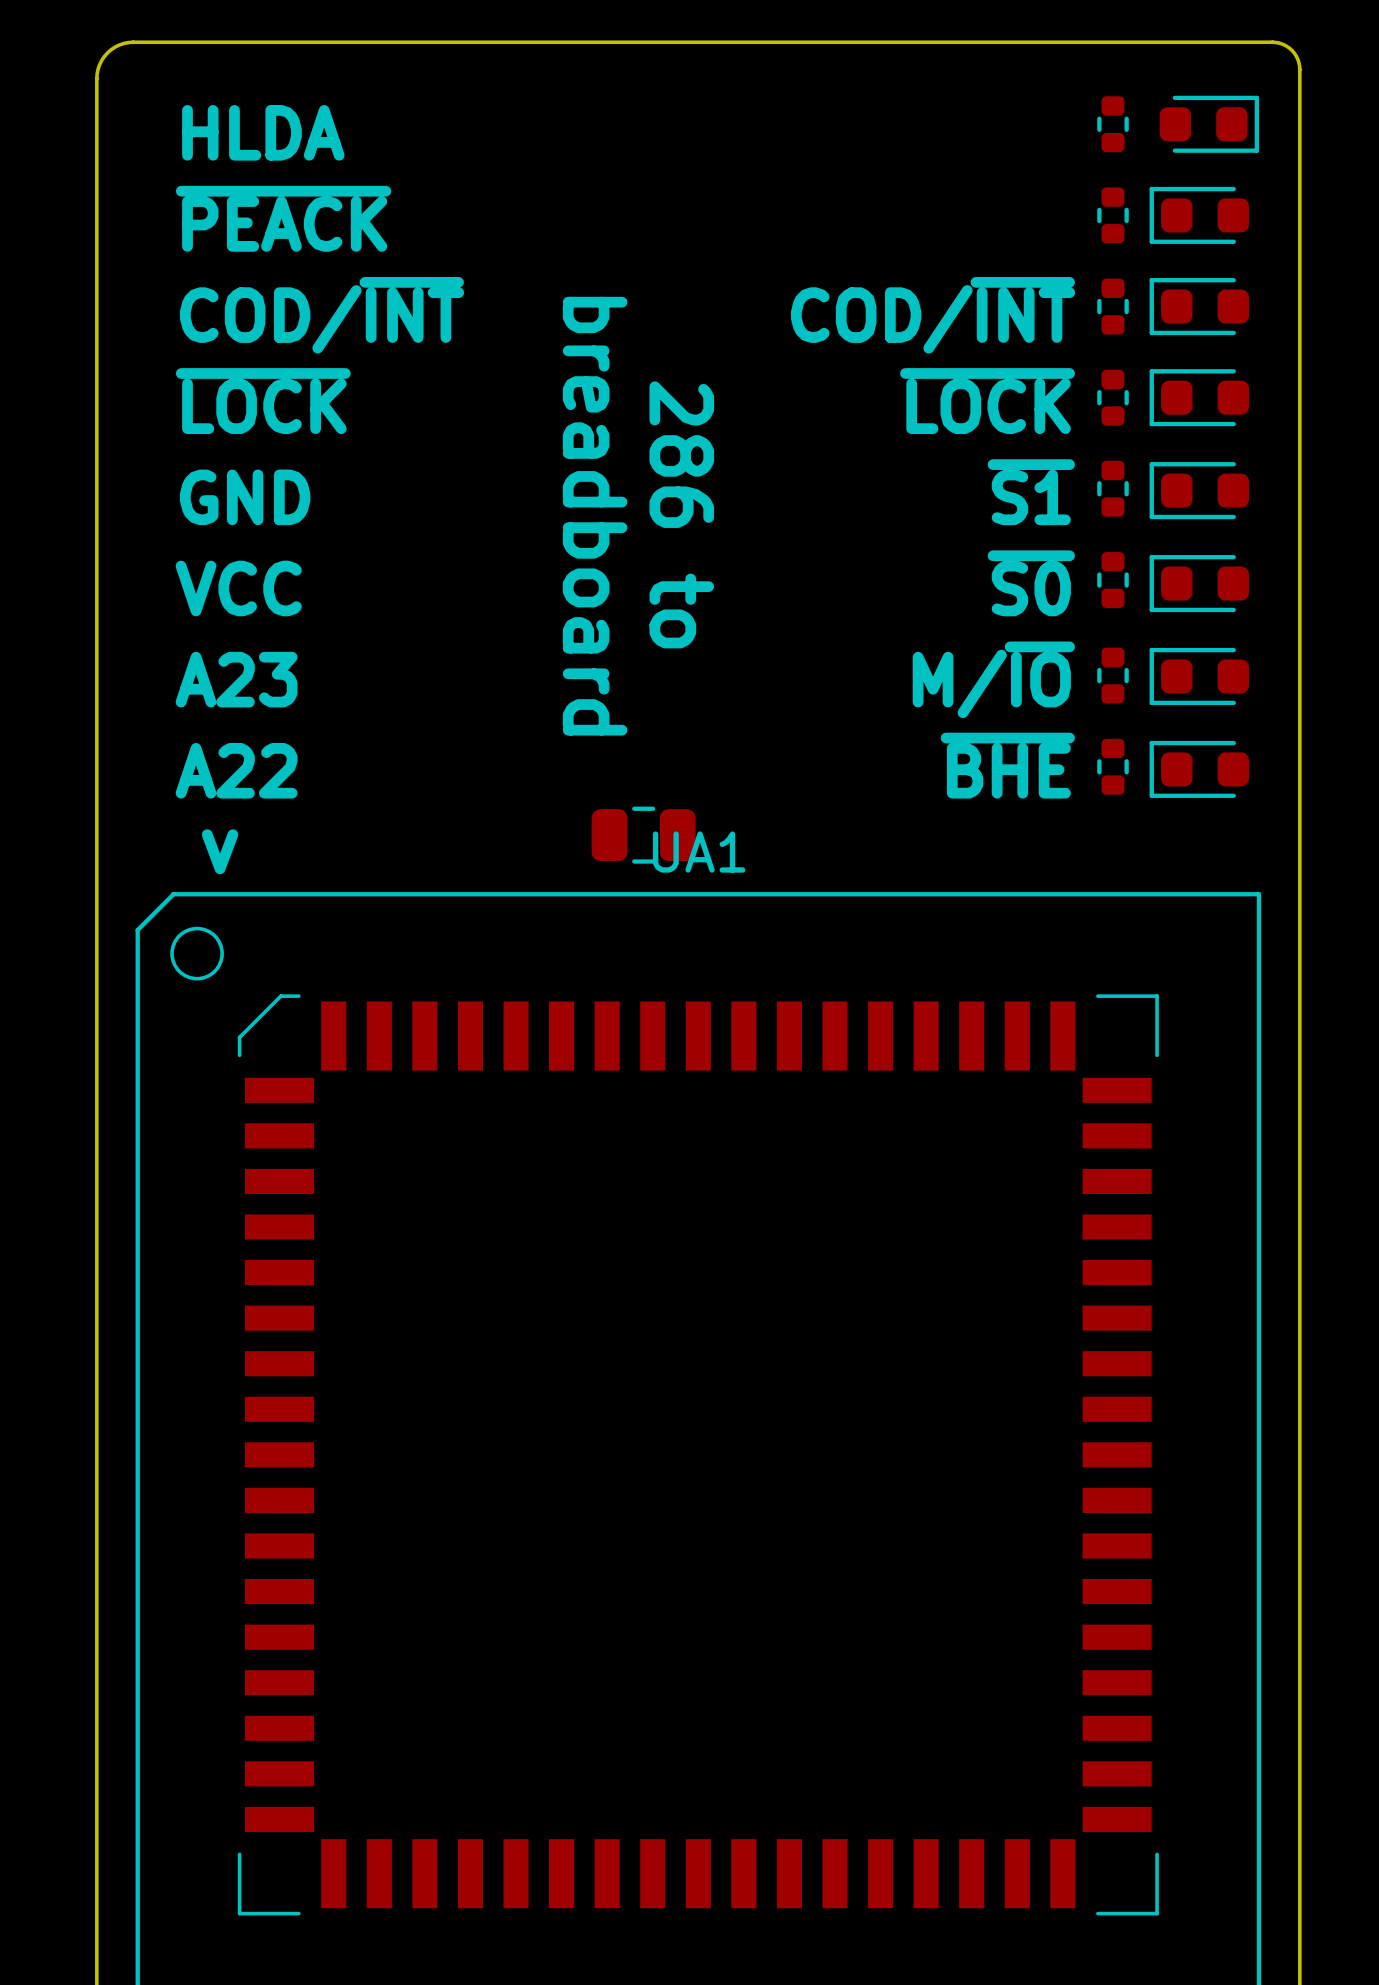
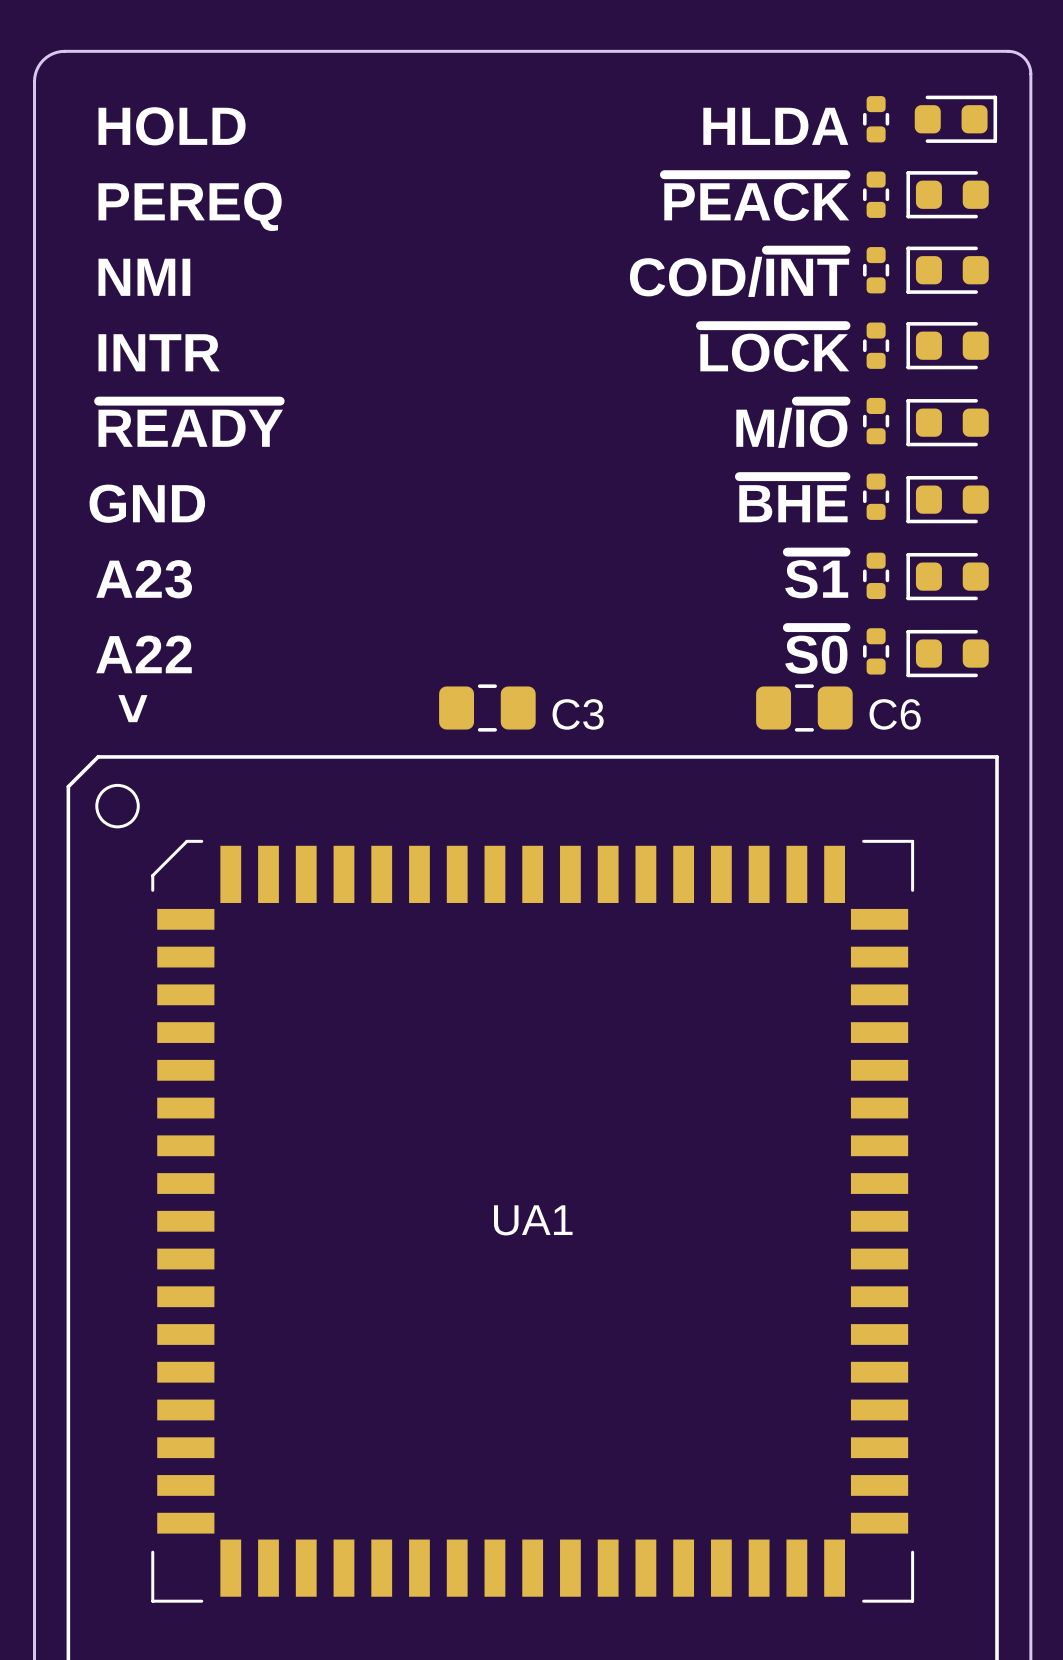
text: HLDA (263, 132) -> HOLD (172, 126)
text: none -> HLDA (775, 126)
text: ~{PEACK} (283, 218) -> PEREQ (190, 206)
text: none -> ~{PEACK} (756, 197)
text: COD/~{INT} (322, 315) -> NMI (144, 277)
text: ~{LOCK} (263, 401) -> INTR (159, 352)
text: ~{S1} (1031, 492) -> M/~{IO} (791, 424)
text: GND (245, 497) -> ~{READY} (190, 423)
text: 286 to (681, 514) -> none
text: breadboard (595, 516) -> none
text: ~{S0} (1031, 583) -> ~{BHE} (793, 499)
text: VCC (238, 588) -> GND (147, 503)
text: M/~{IO} (993, 679) -> ~{S1} (816, 575)
text: ~{BHE} (1007, 765) -> ~{S0} (816, 650)
part: (643, 835) -> none
C3: none -> (487, 708)
C6: none -> (804, 708)
UA1 name position: UA1 (699, 852) -> UA1 (533, 1220)

